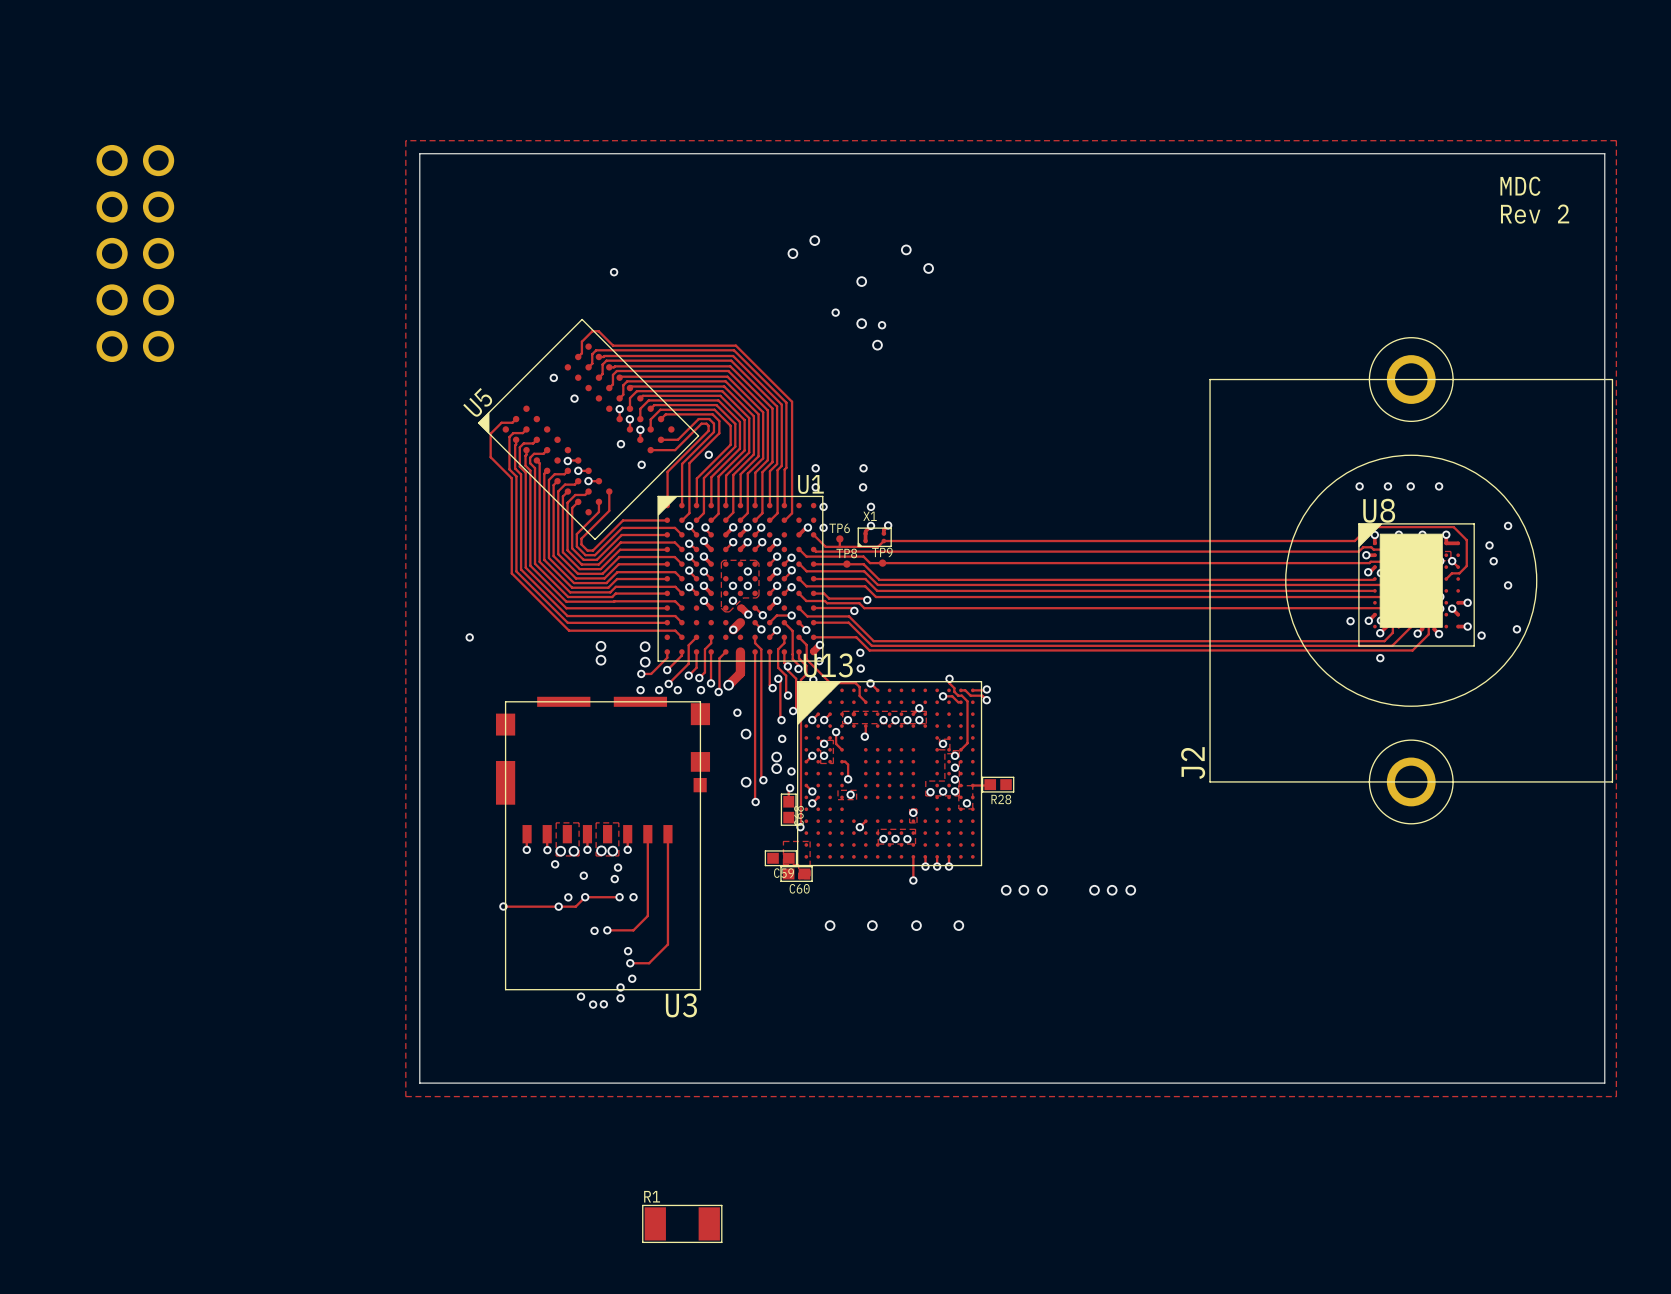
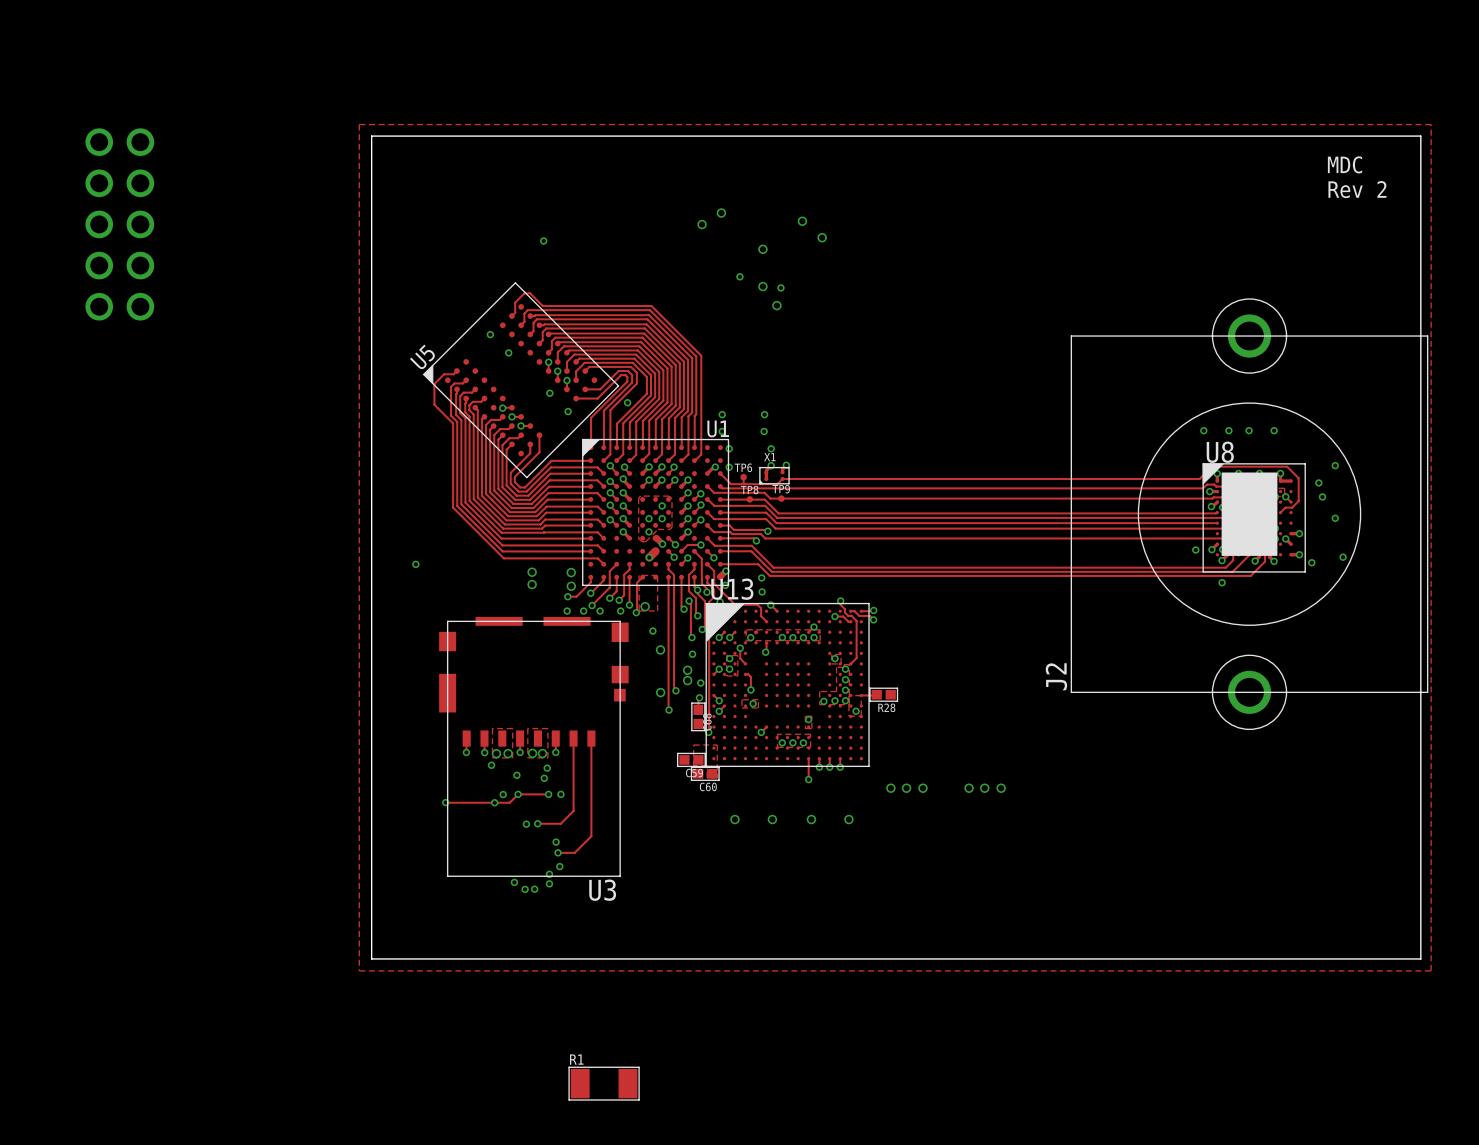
zone outline: none -> (639, 575) (639, 610) (657, 610) (657, 575) (639, 575)
track: (740, 651) (740, 673) (728, 685) -> none

